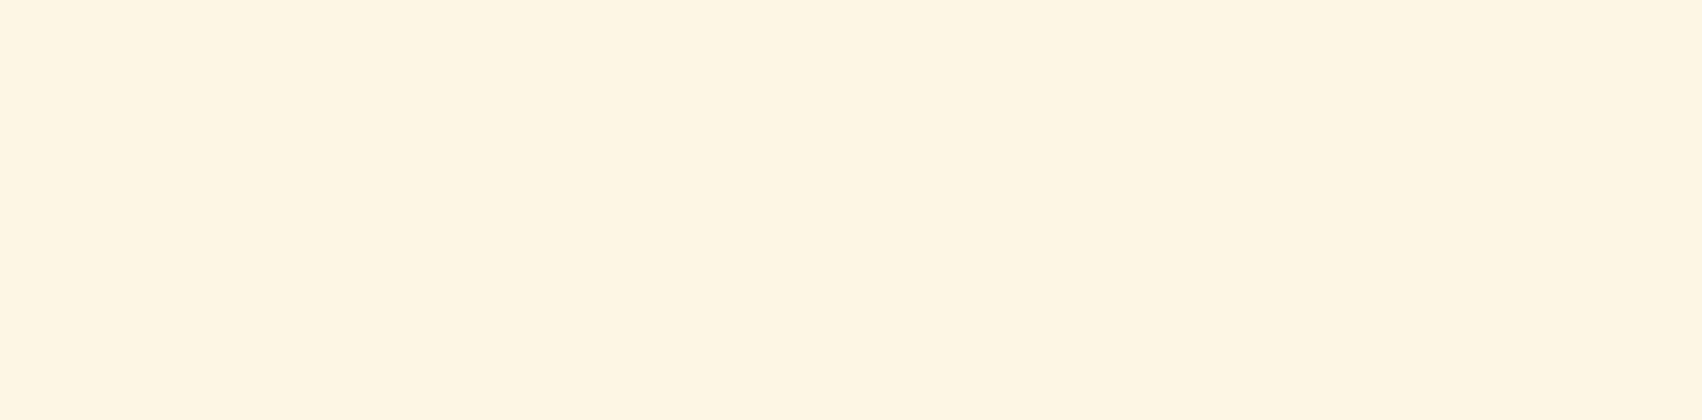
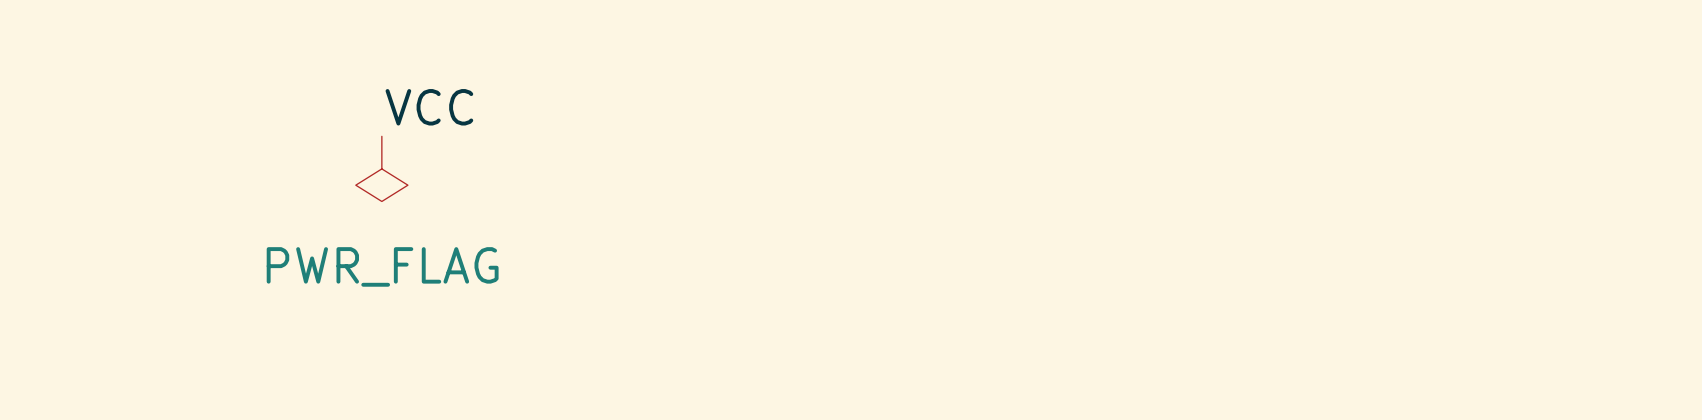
label: none -> VCC (429, 107)
power symbol: none -> PWR_FLAG (381, 168)

